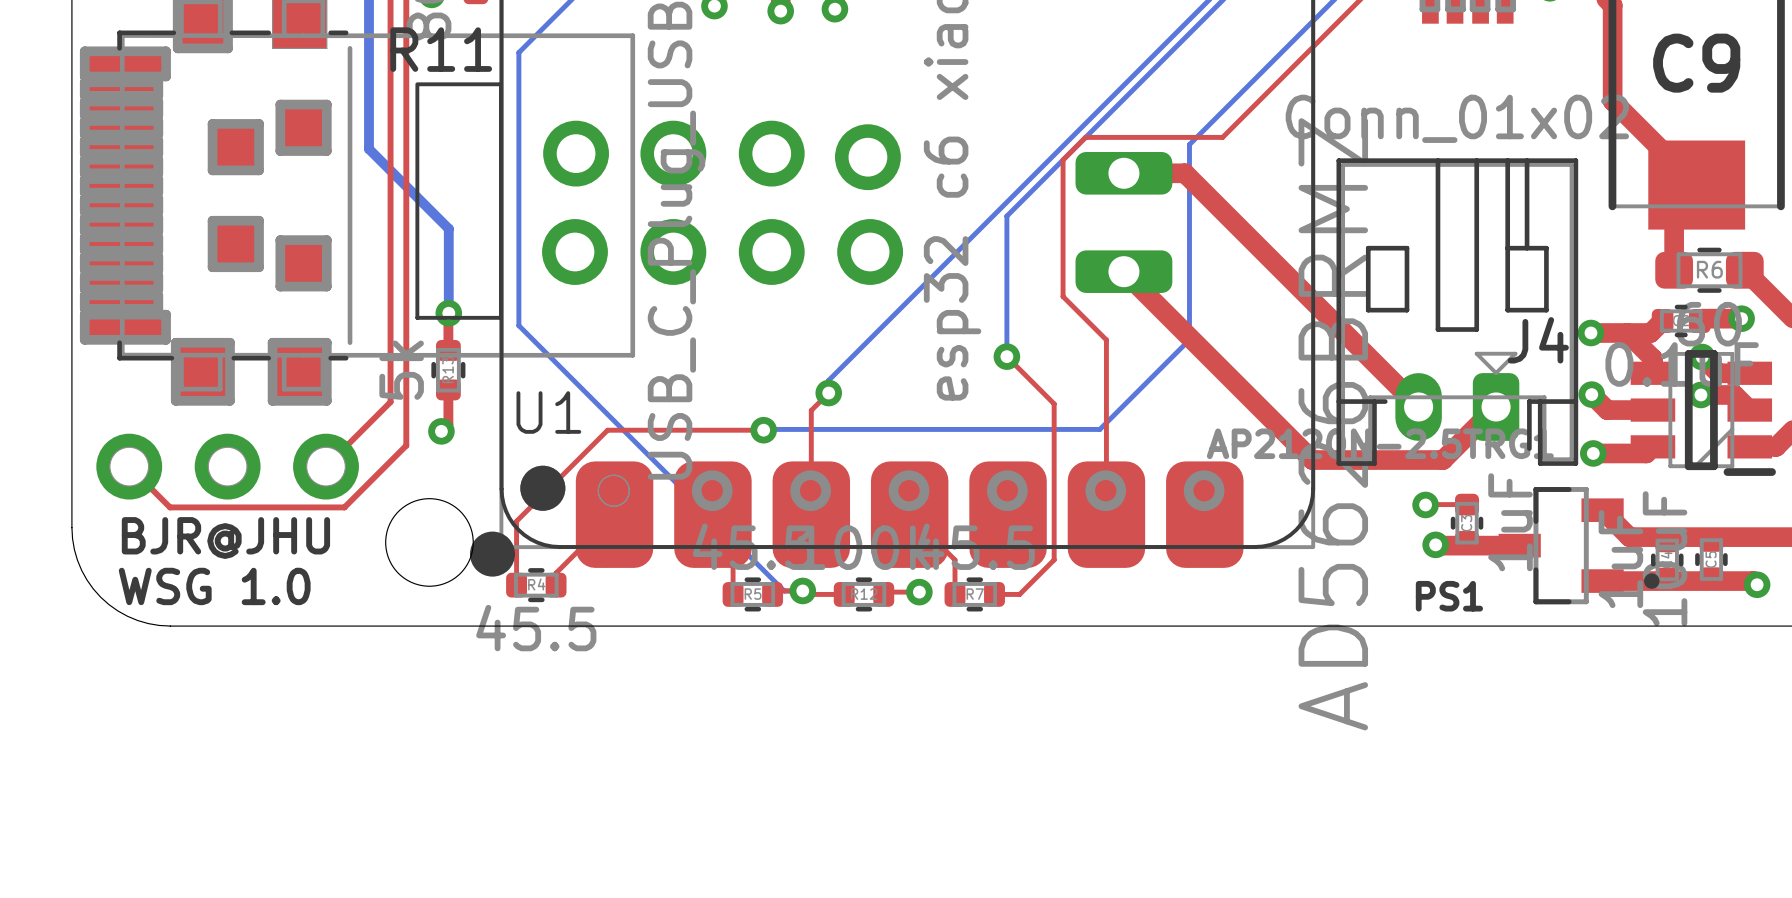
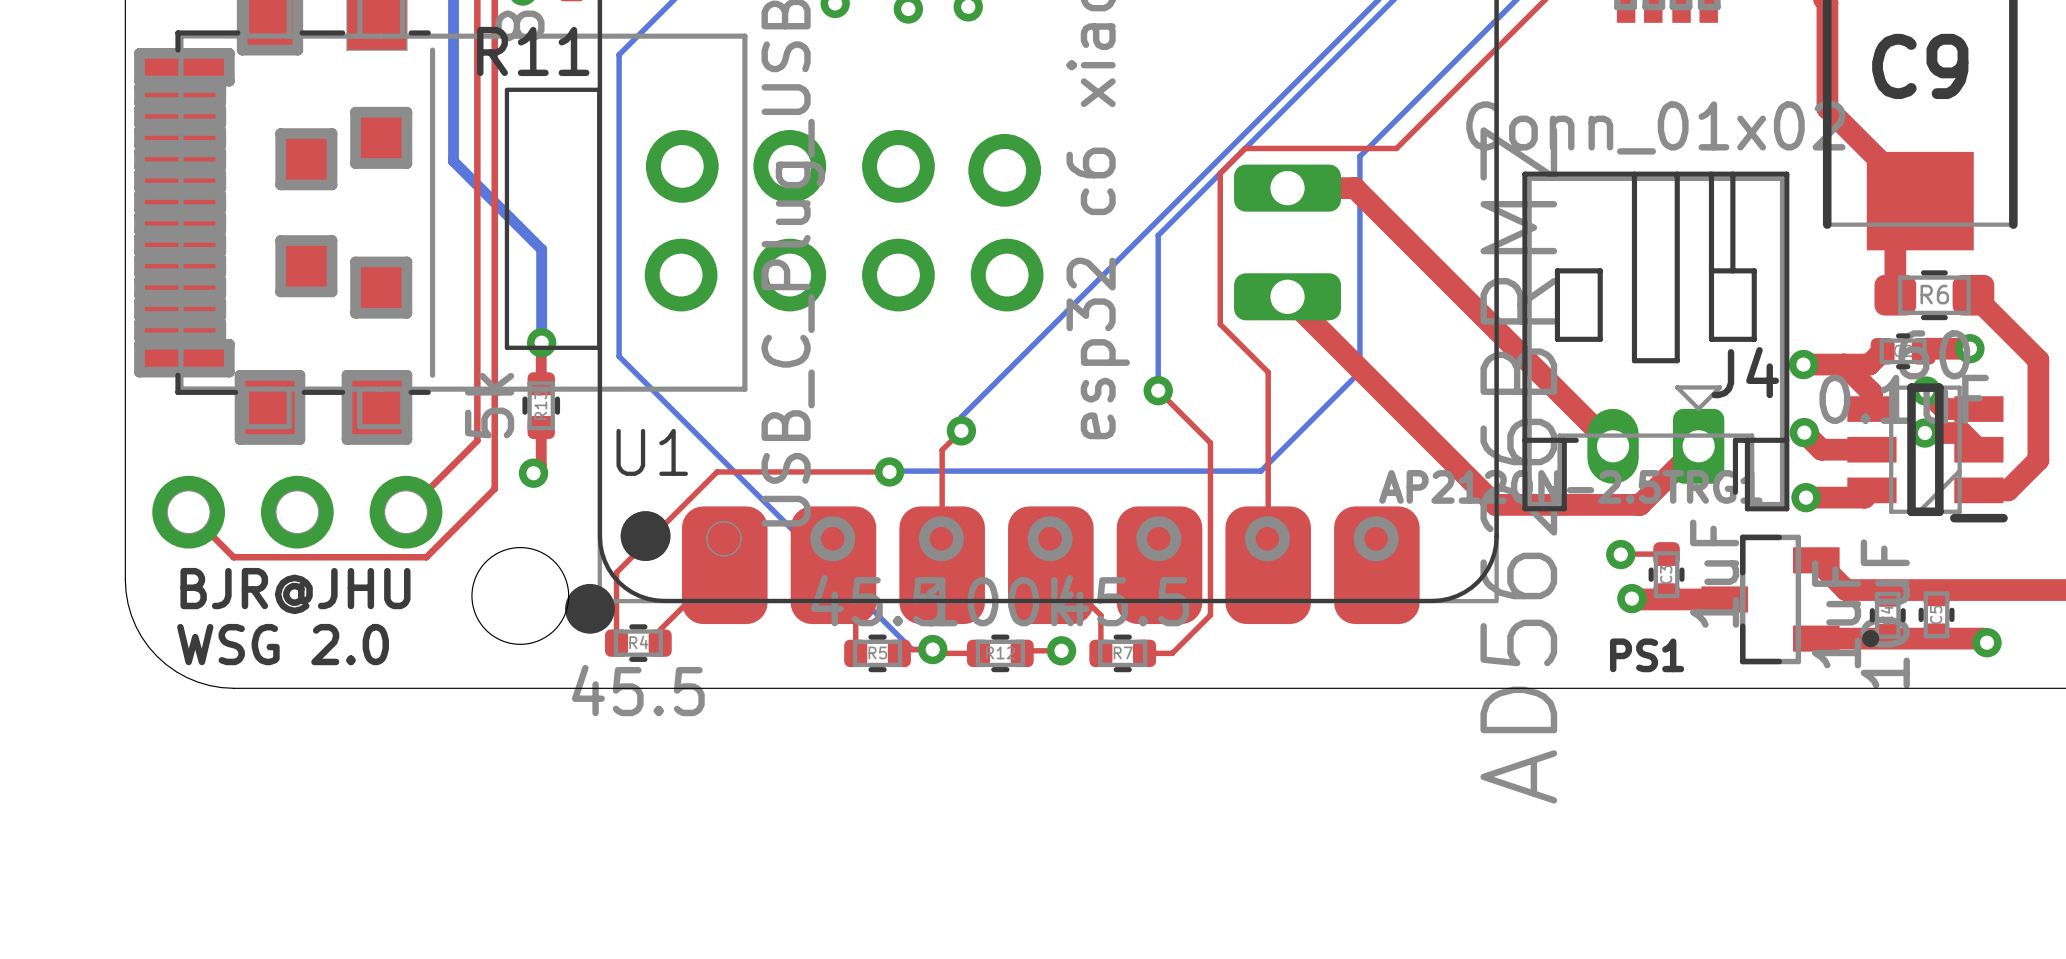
text: WSG 1.0 (214, 586) -> WSG 2.0 (283, 644)

